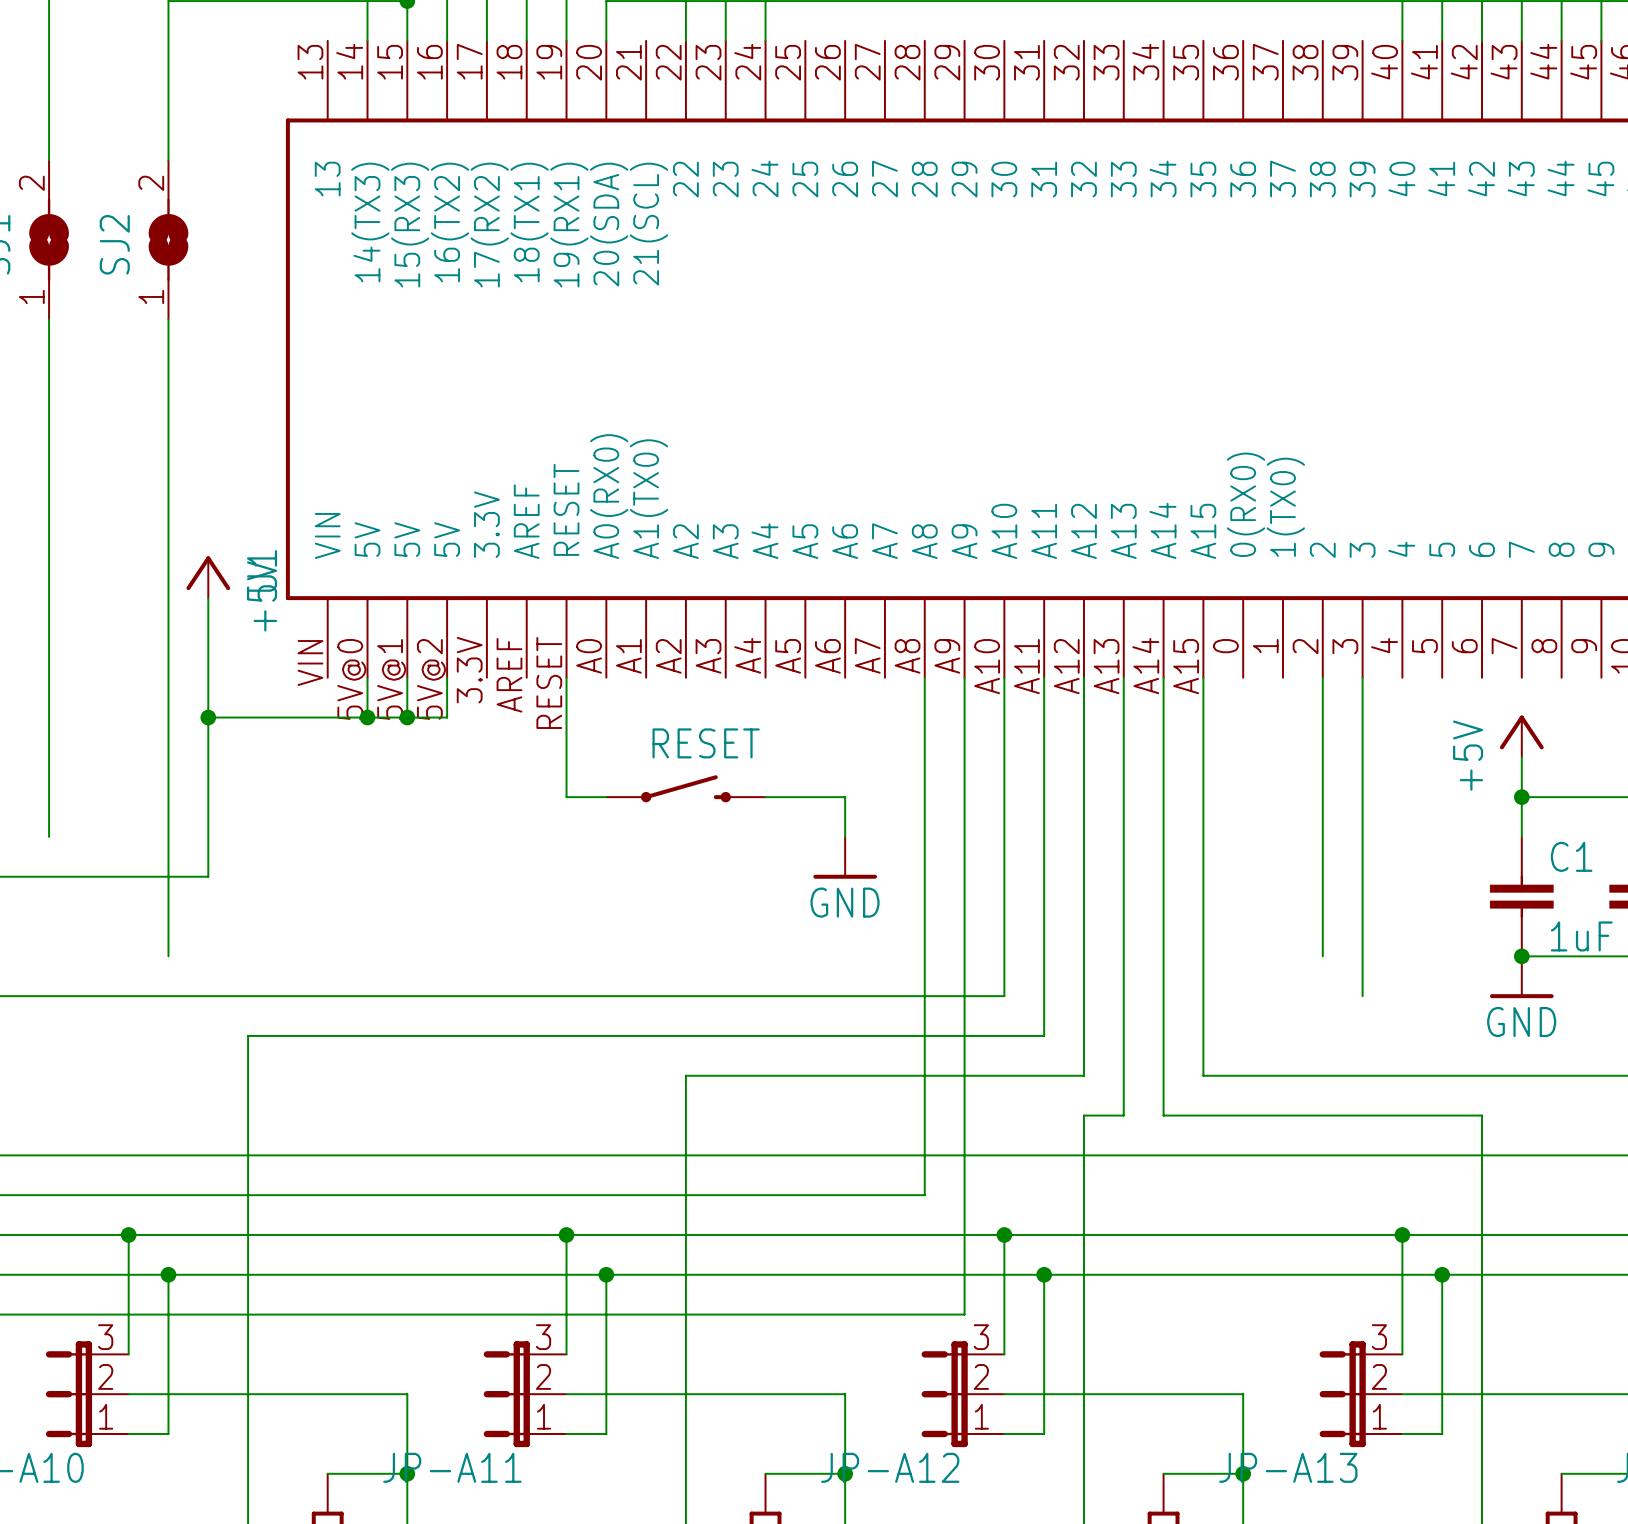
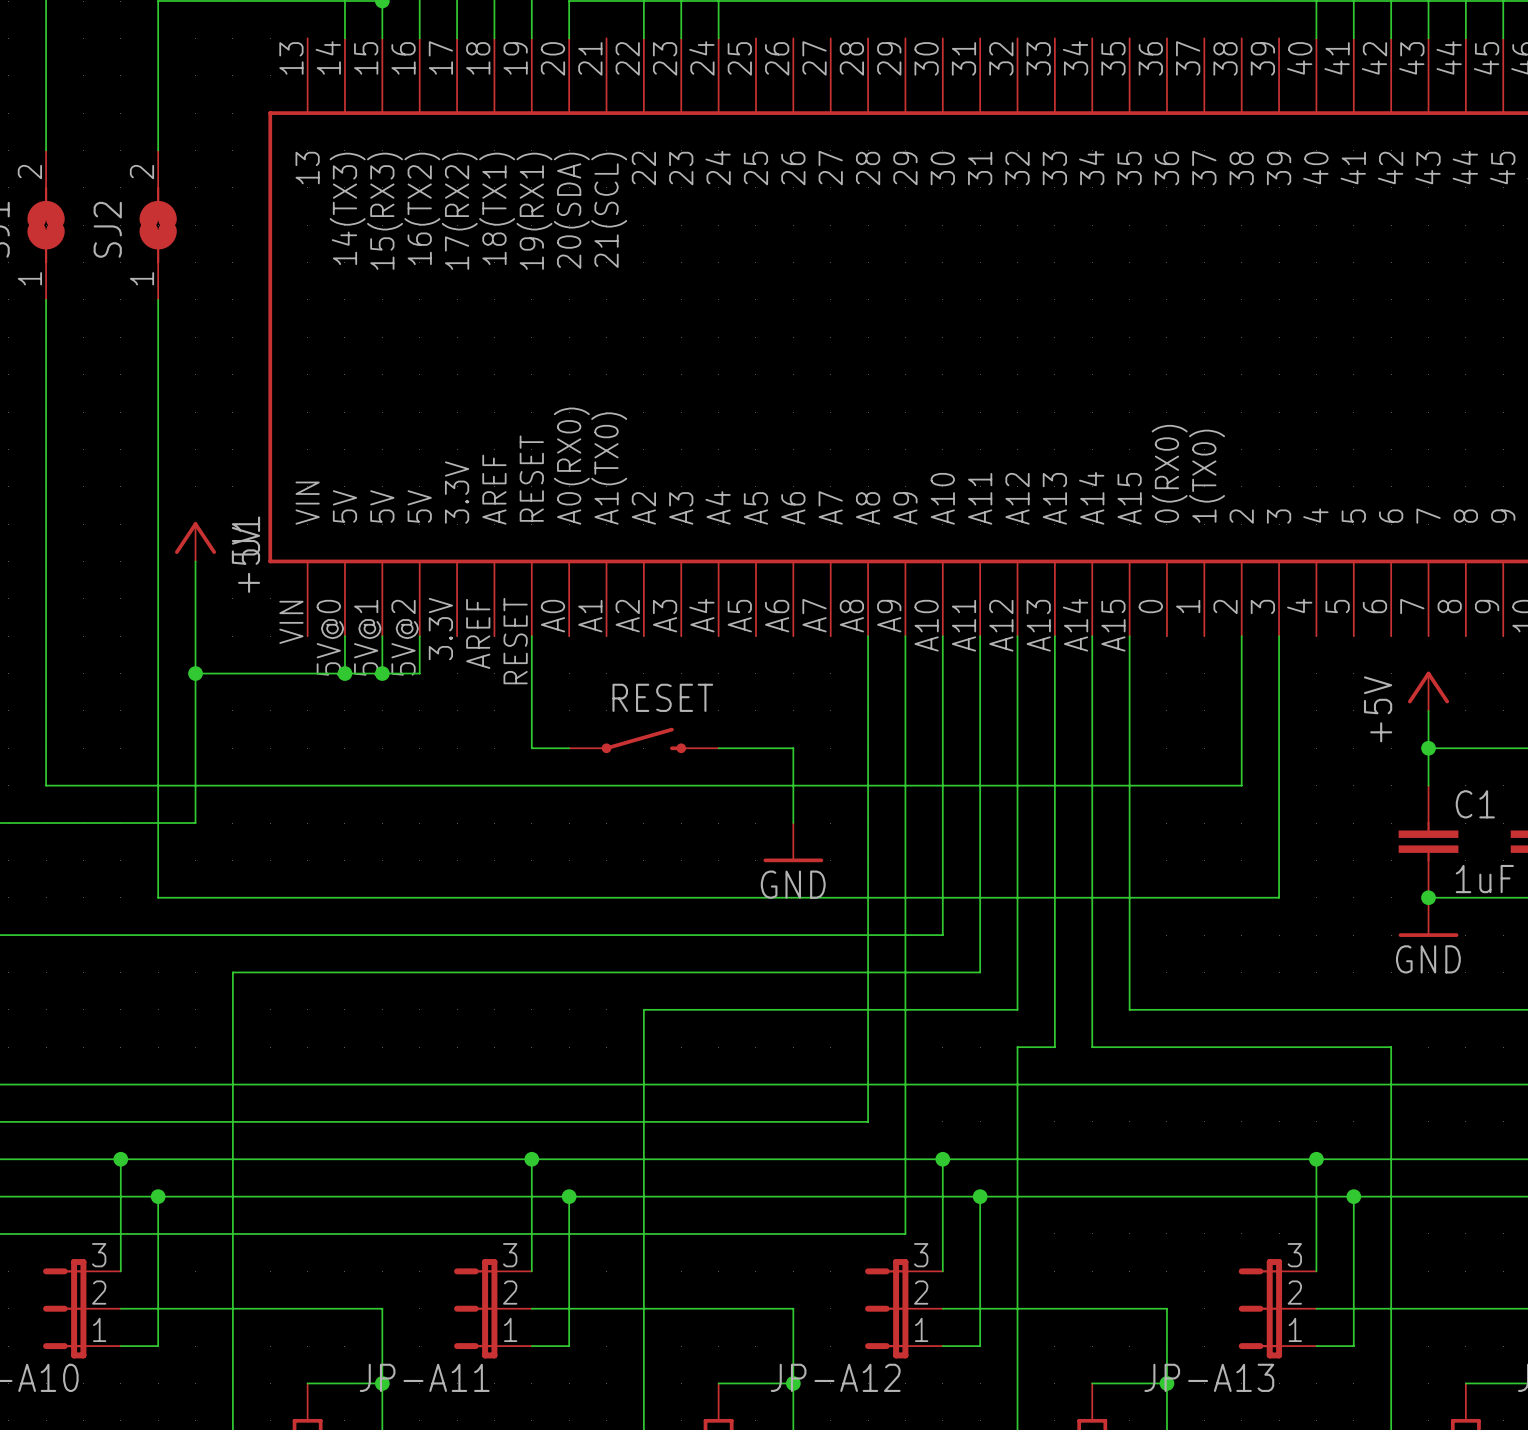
wire: (1322, 836) (1322, 956) -> (1241, 785) (46, 785)
power symbol position: GND (845, 857) -> GND (793, 842)
wire: (1362, 956) (1362, 996) -> (1279, 897) (158, 897)

